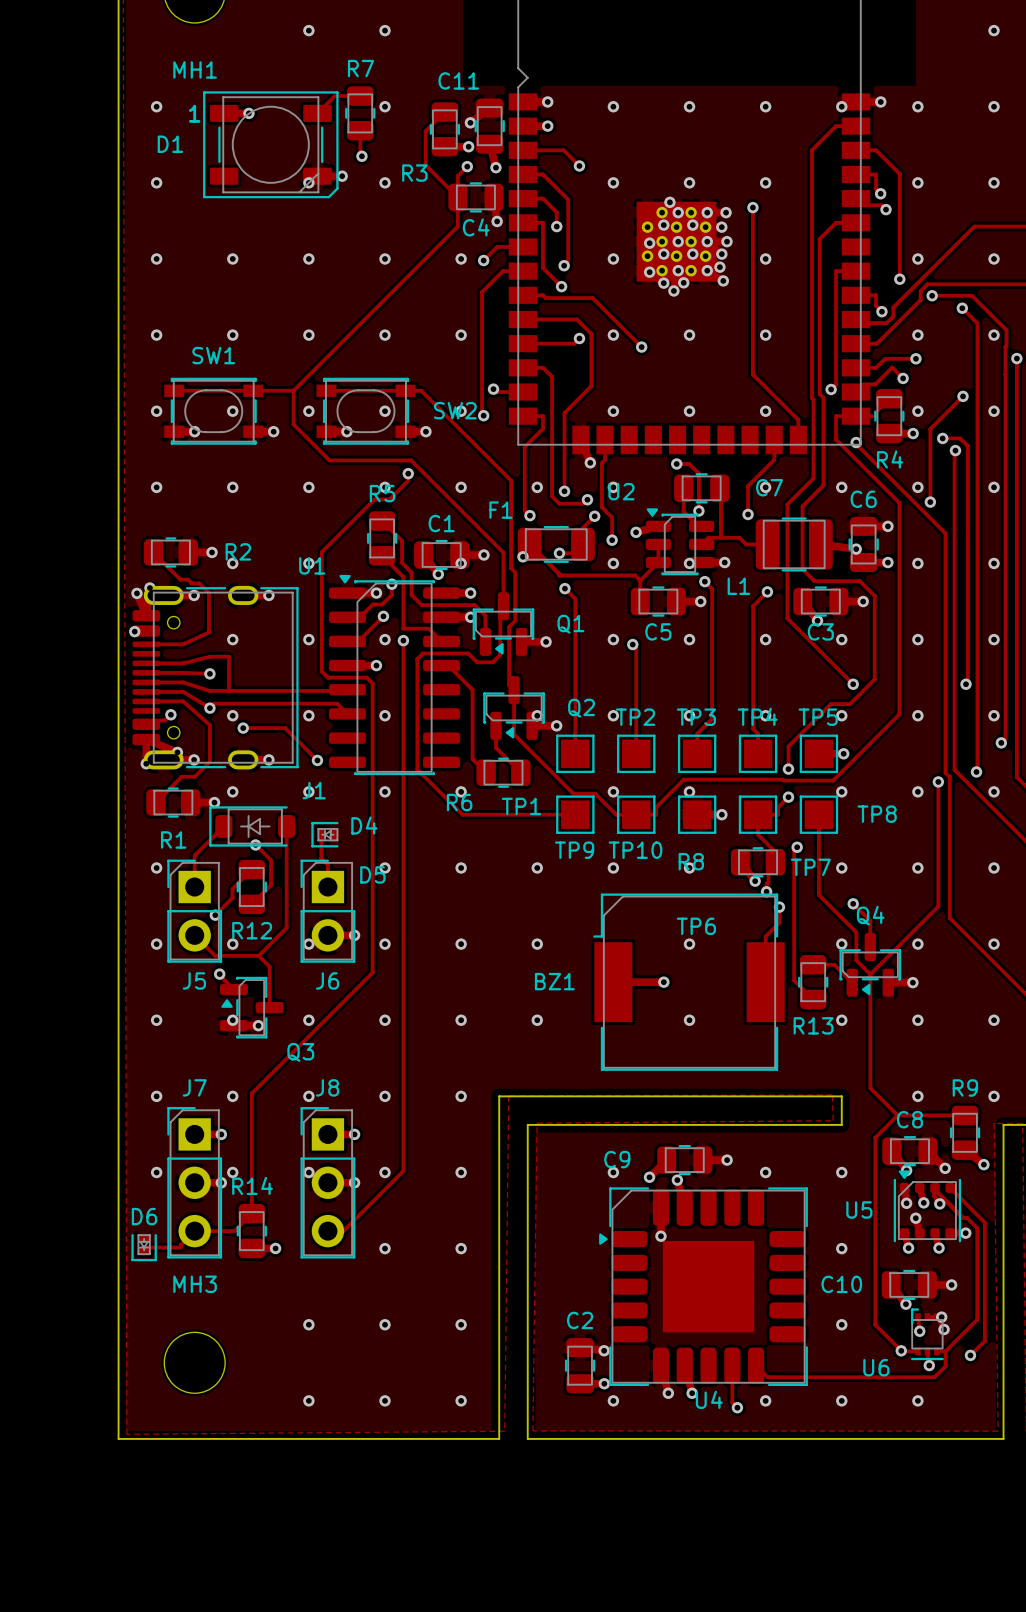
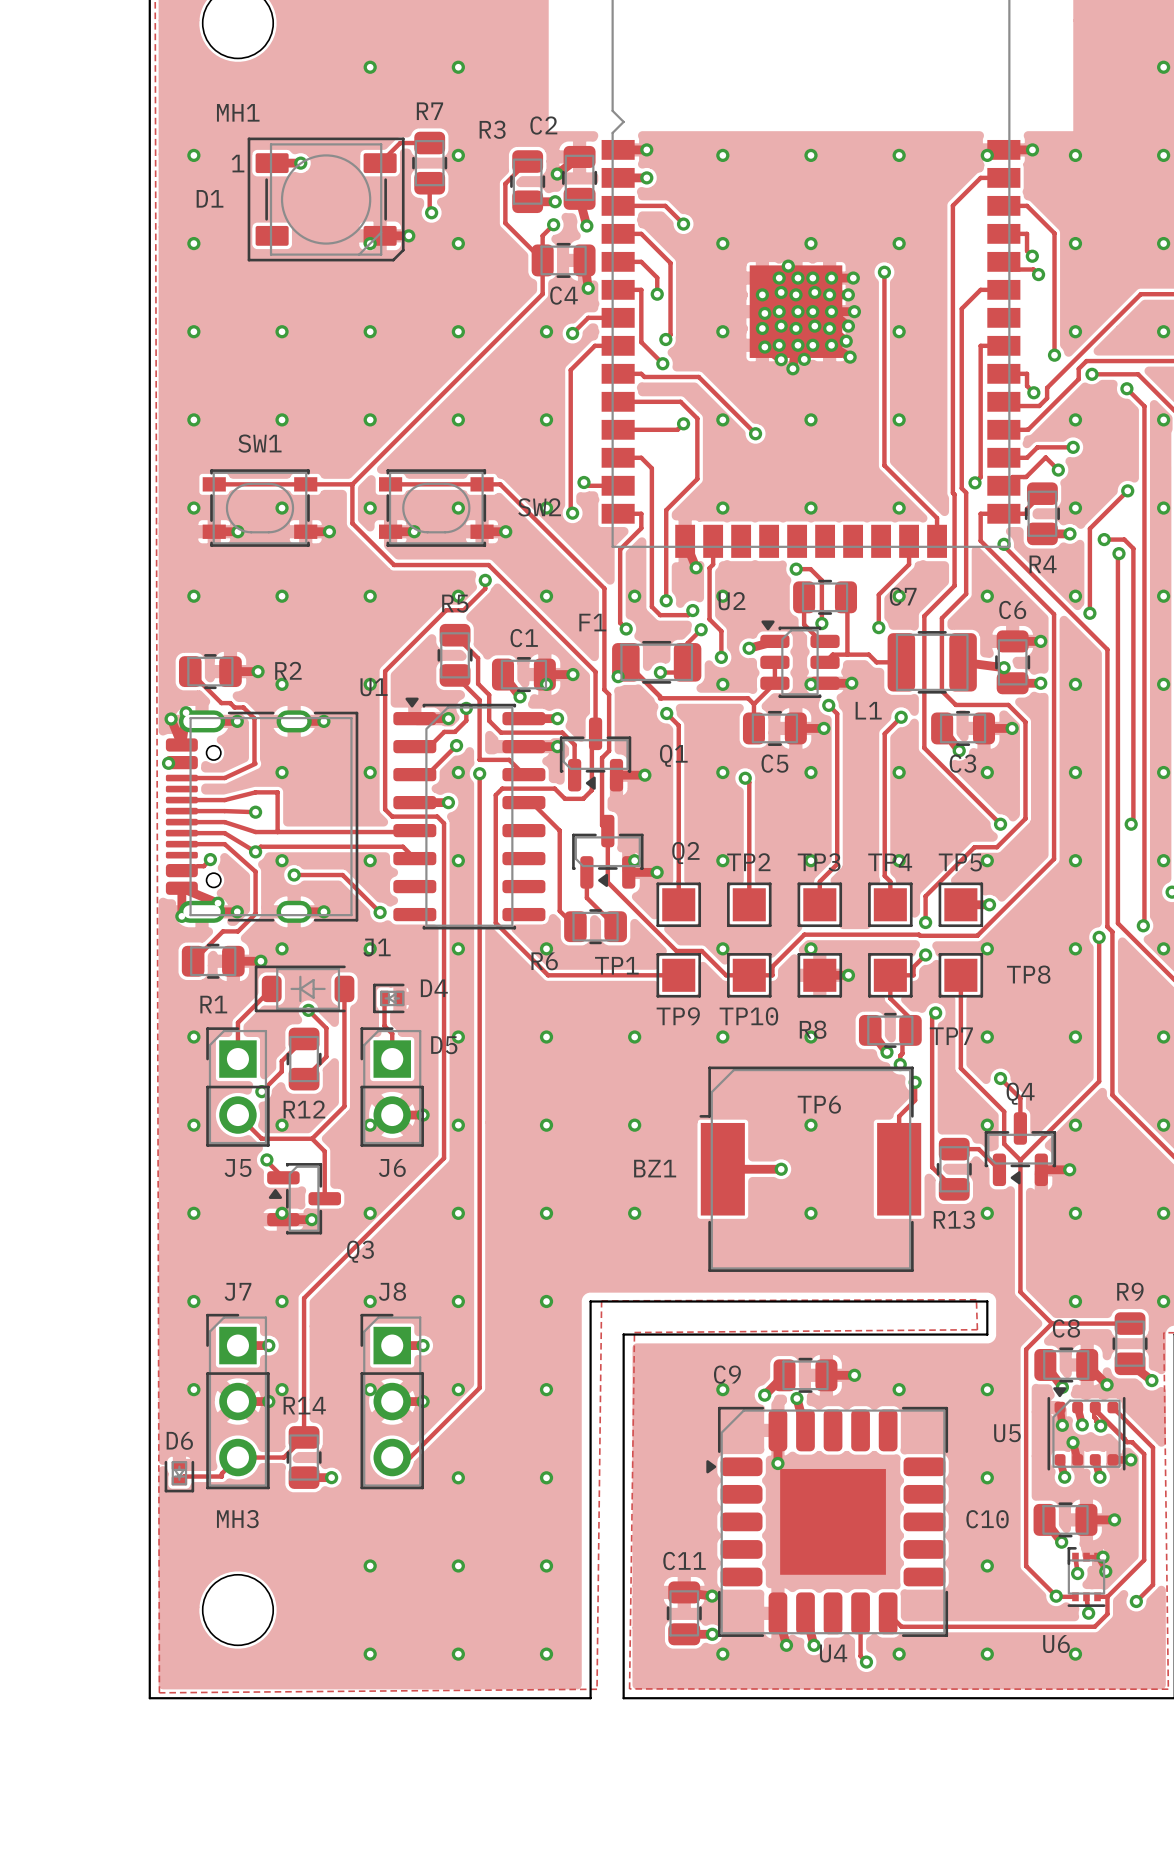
C11 name: C11 (458, 80) -> C2 (543, 125)
R3 name position: R3 (414, 173) -> R3 (492, 129)
C2 name: C2 (580, 1320) -> C11 (684, 1561)
U6 name position: U6 (876, 1367) -> U6 (1056, 1644)

